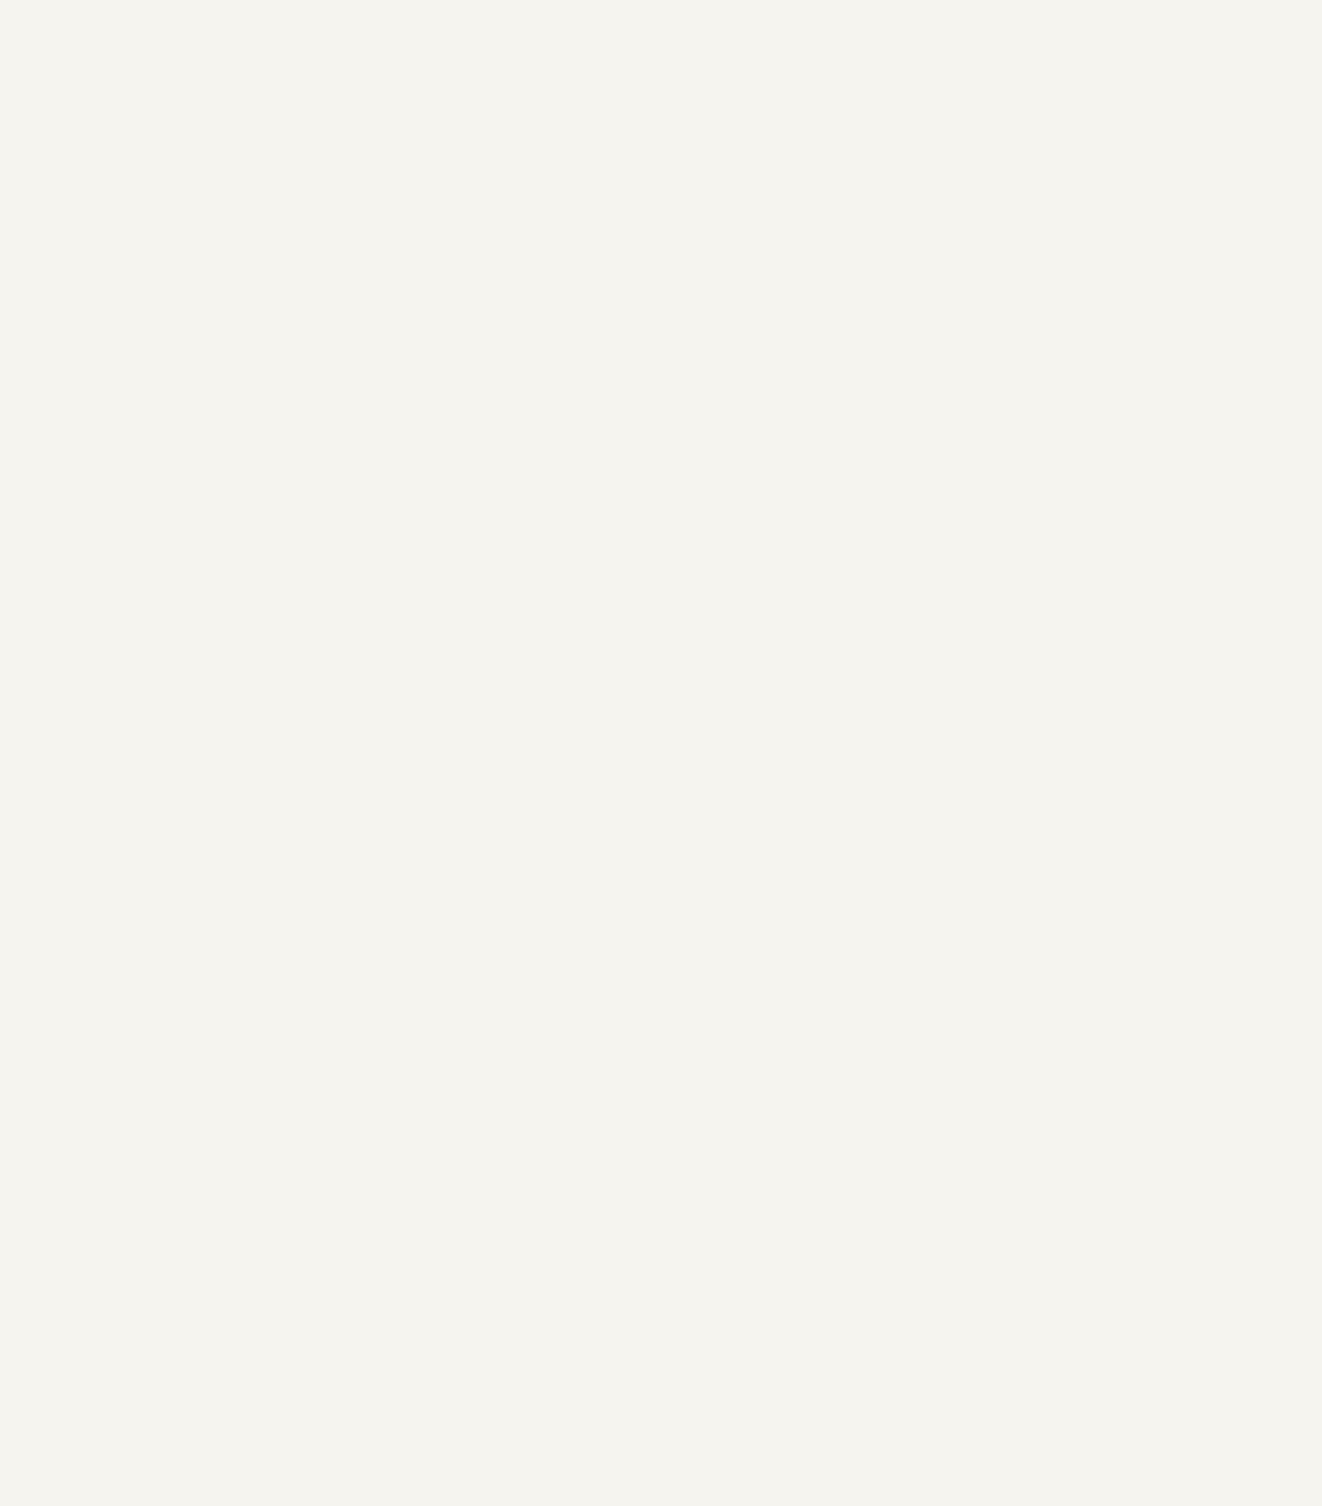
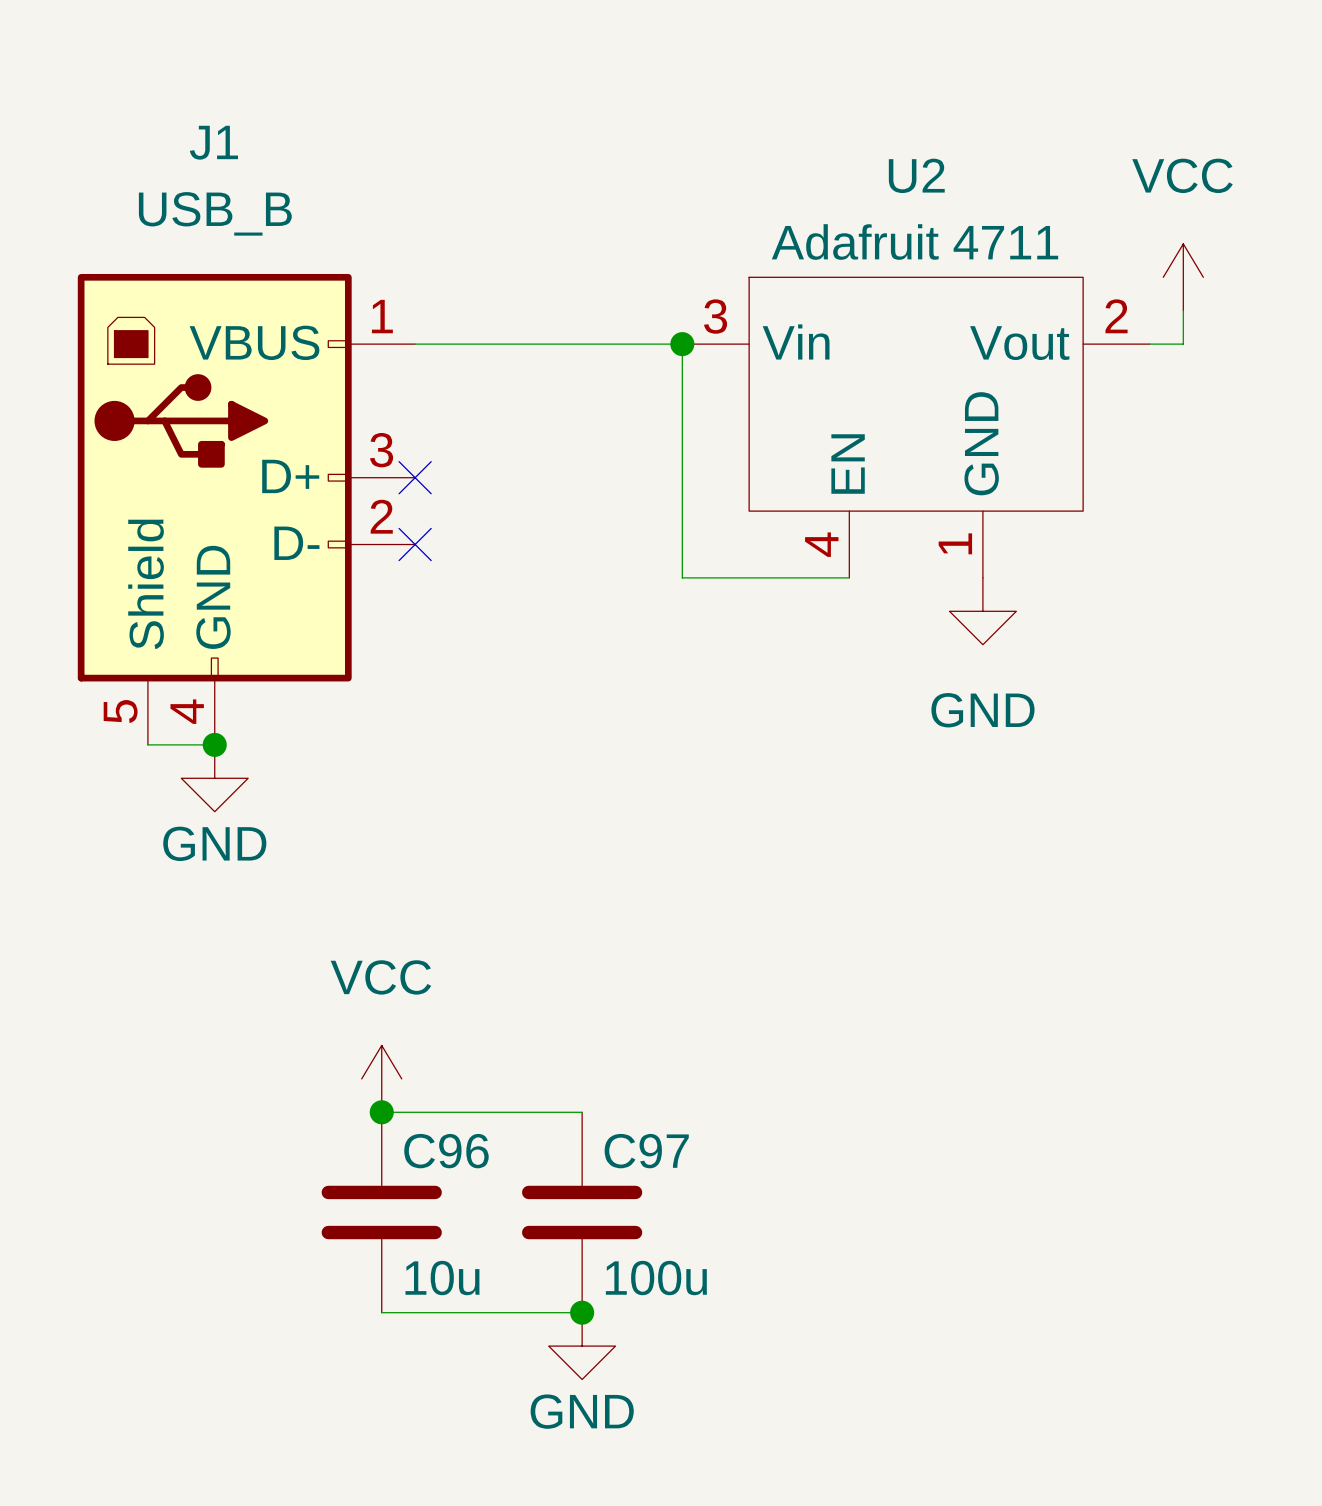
power symbol: none -> VCC (1183, 277)
wire: none -> (1183, 310) (1183, 344) (1149, 344)
wire: none -> (415, 344) (682, 344) (682, 577) (849, 577)
junction: none -> (682, 344)
U2: none -> Adafruit 4711 (916, 427)
no-connect mark: none -> (415, 477)
J1: none -> USB_B (246, 509)
no-connect mark: none -> (415, 544)
power symbol: none -> GND (982, 611)
wire: none -> (147, 744) (214, 744)
junction: none -> (214, 744)
power symbol: none -> GND (214, 778)
power symbol: none -> VCC (381, 1078)
wire: none -> (381, 1112) (582, 1112)
junction: none -> (381, 1112)
C96: none -> 10u (381, 1212)
C97: none -> 100u (582, 1212)
wire: none -> (381, 1312) (582, 1312)
junction: none -> (582, 1312)
power symbol: none -> GND (582, 1346)

